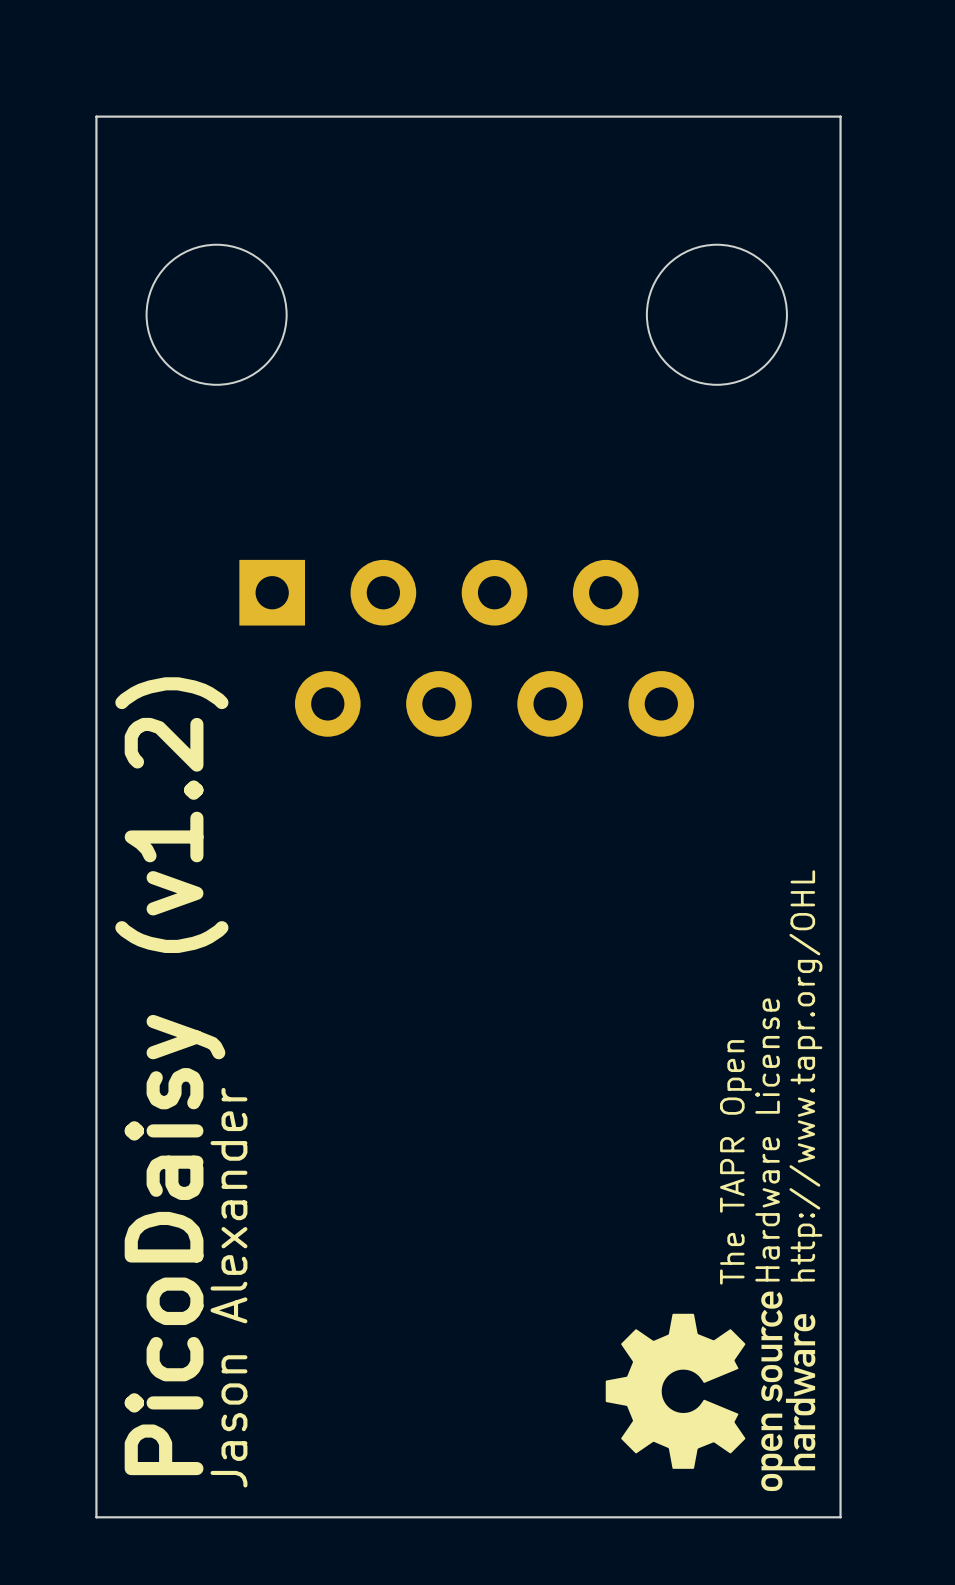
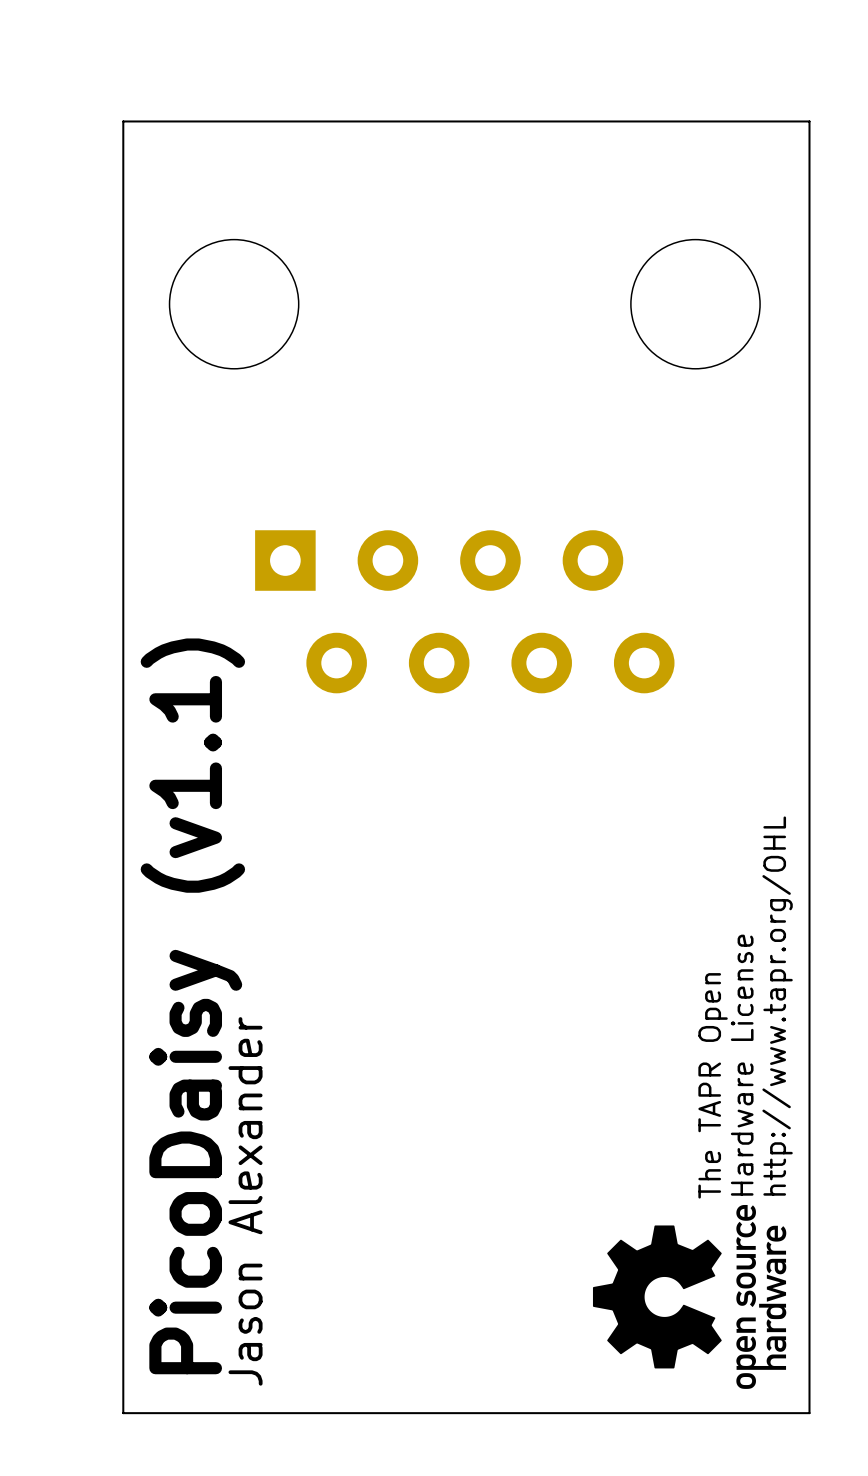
text: PicoDaisy (v1.2) (171, 1076) -> PicoDaisy (v1.1) (192, 1006)

